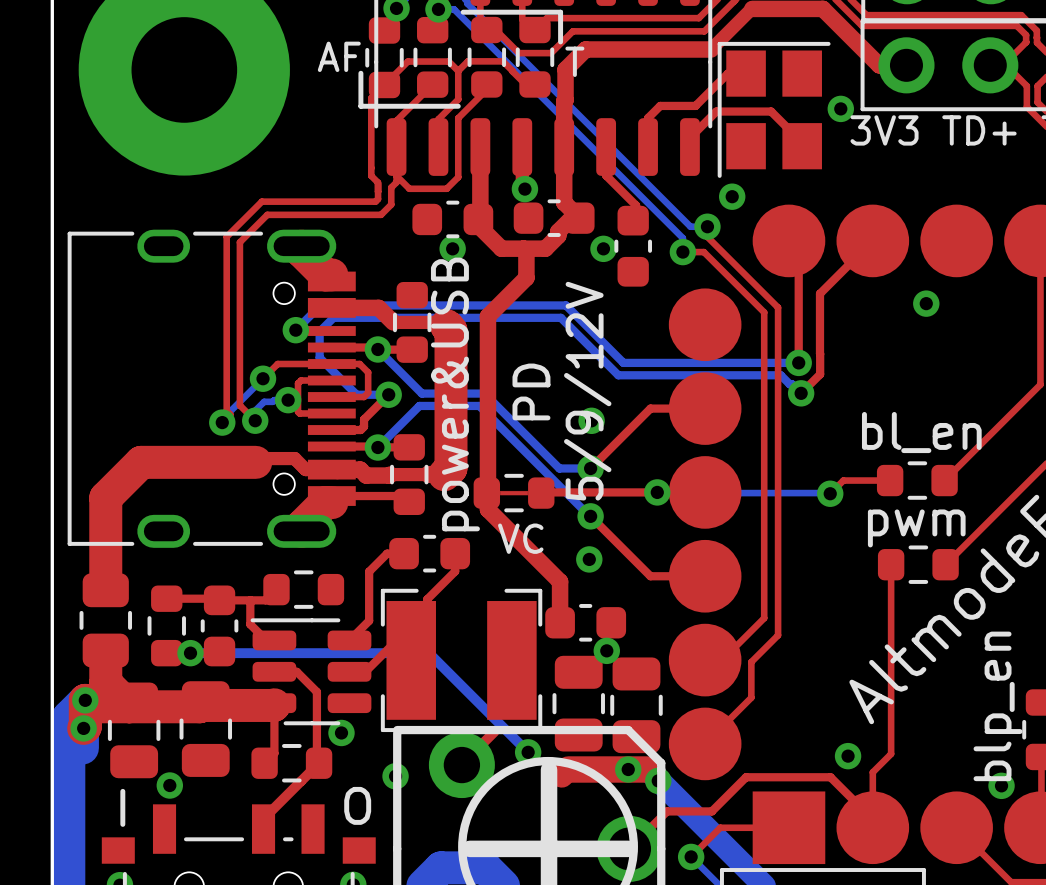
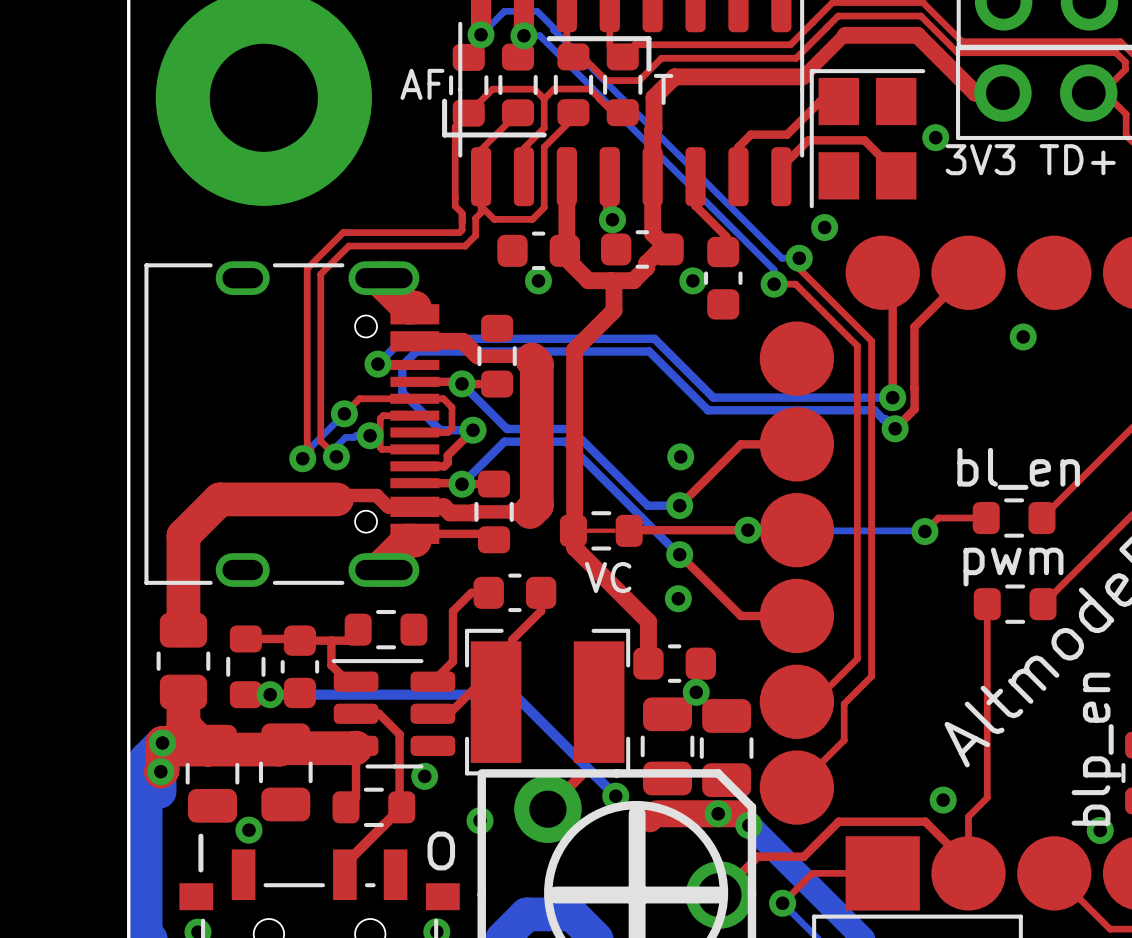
text: PD (531, 391) -> none
text: 5/9/12V (587, 391) -> none
text: power&USB (455, 394) -> none

